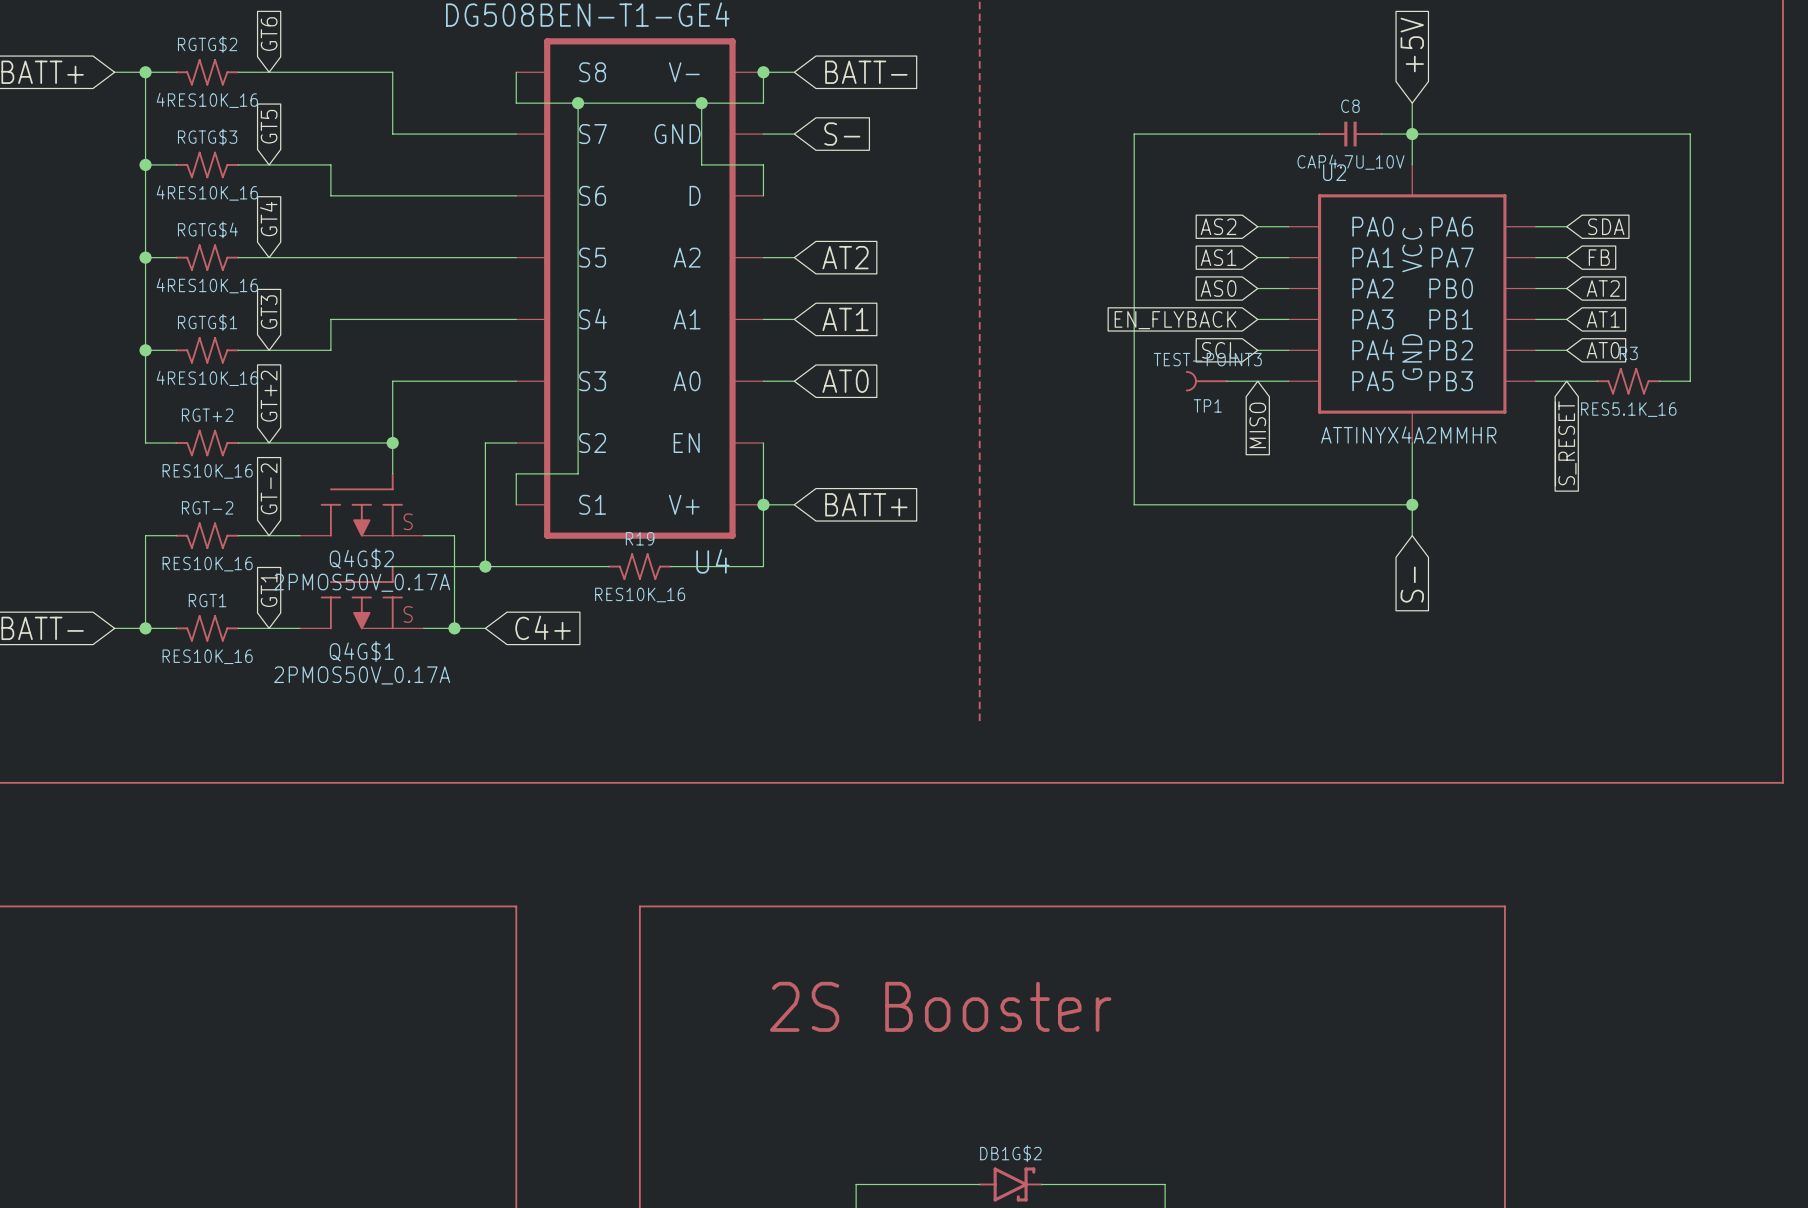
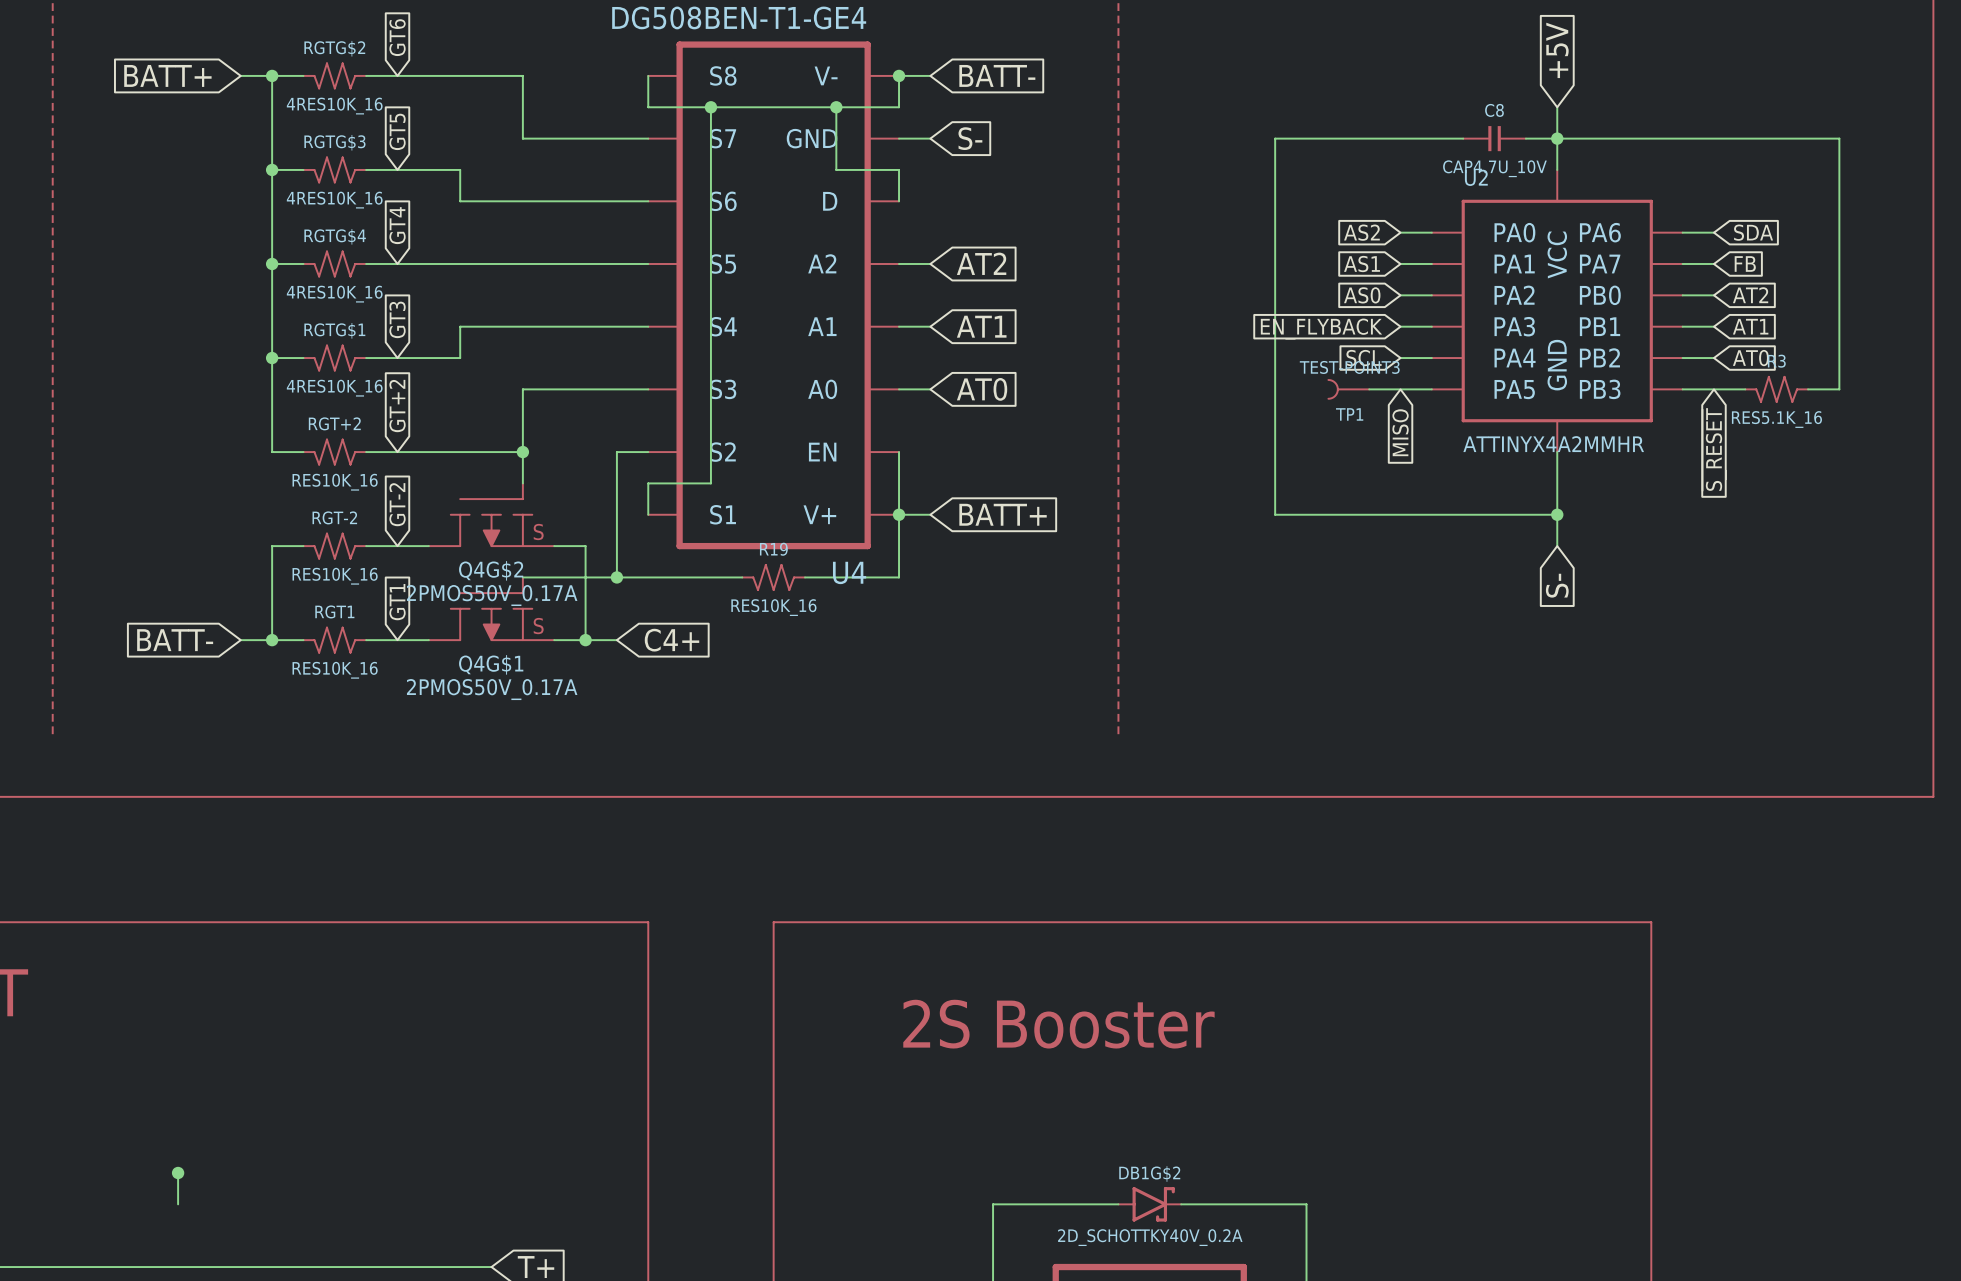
wire: none -> (178, 1172) (178, 1204)
junction: none -> (178, 1172)

